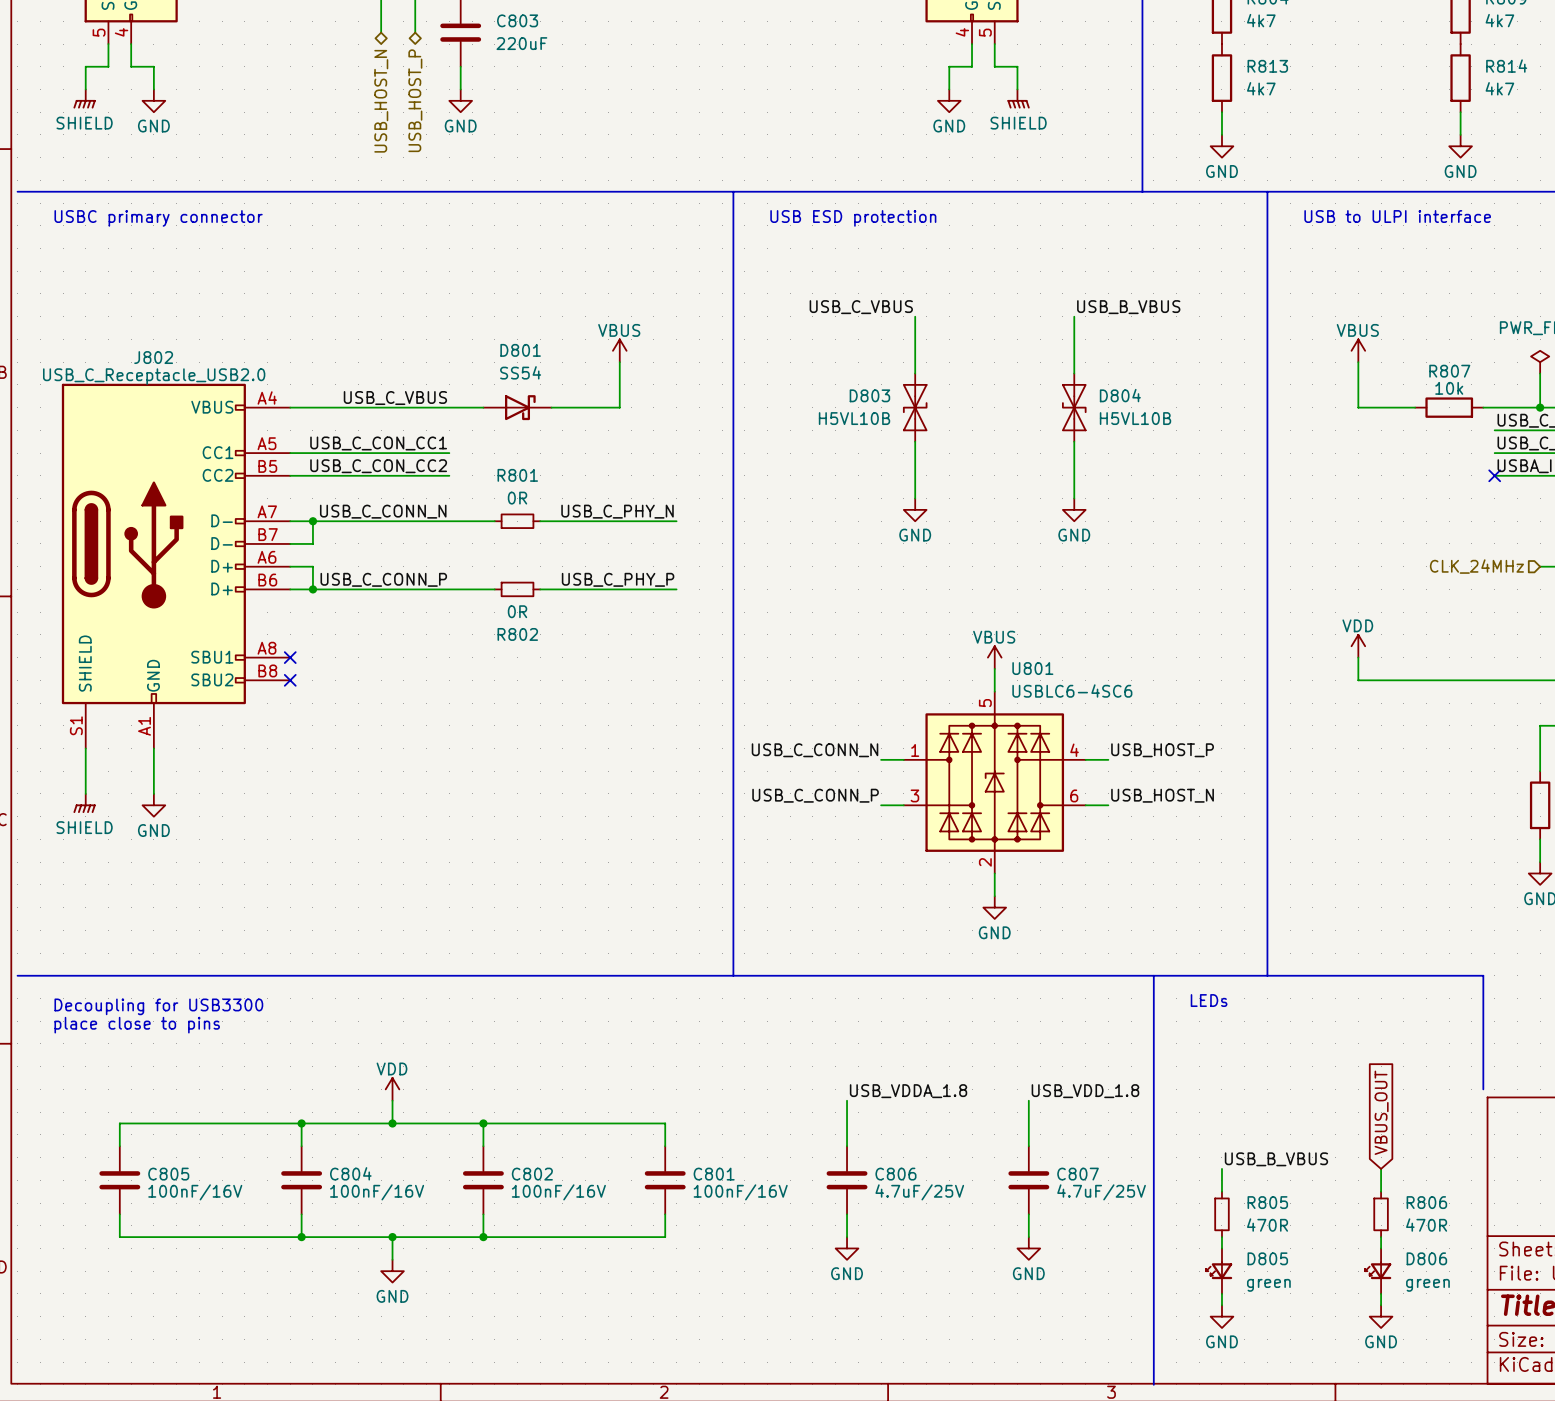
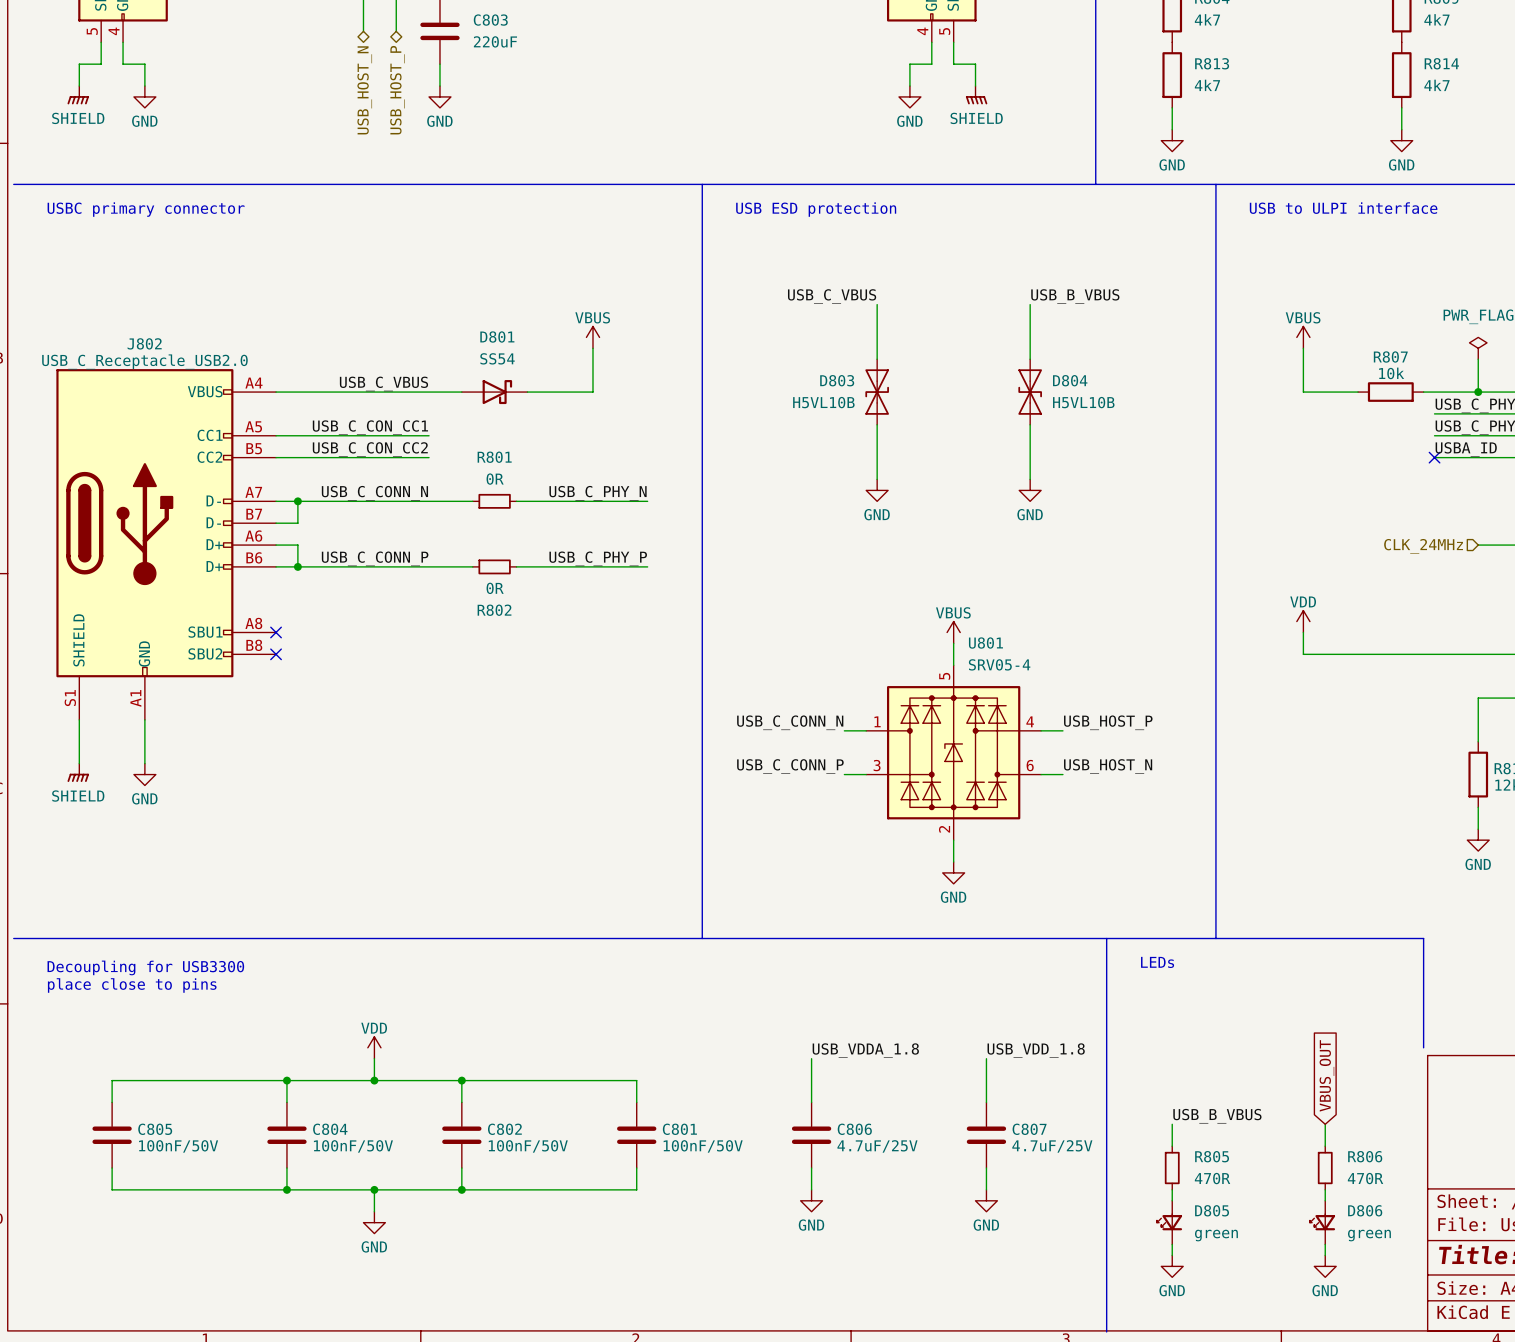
U801 value: USBLC6-4SC6 (1072, 690) -> SRV05-4 (999, 664)
C805 value: 100nF/16V (195, 1192) -> 100nF/50V (178, 1146)
C804 value: 100nF/16V (377, 1192) -> 100nF/50V (353, 1146)
C802 value: 100nF/16V (558, 1192) -> 100nF/50V (528, 1146)
C801 value: 100nF/16V (740, 1192) -> 100nF/50V (703, 1146)

